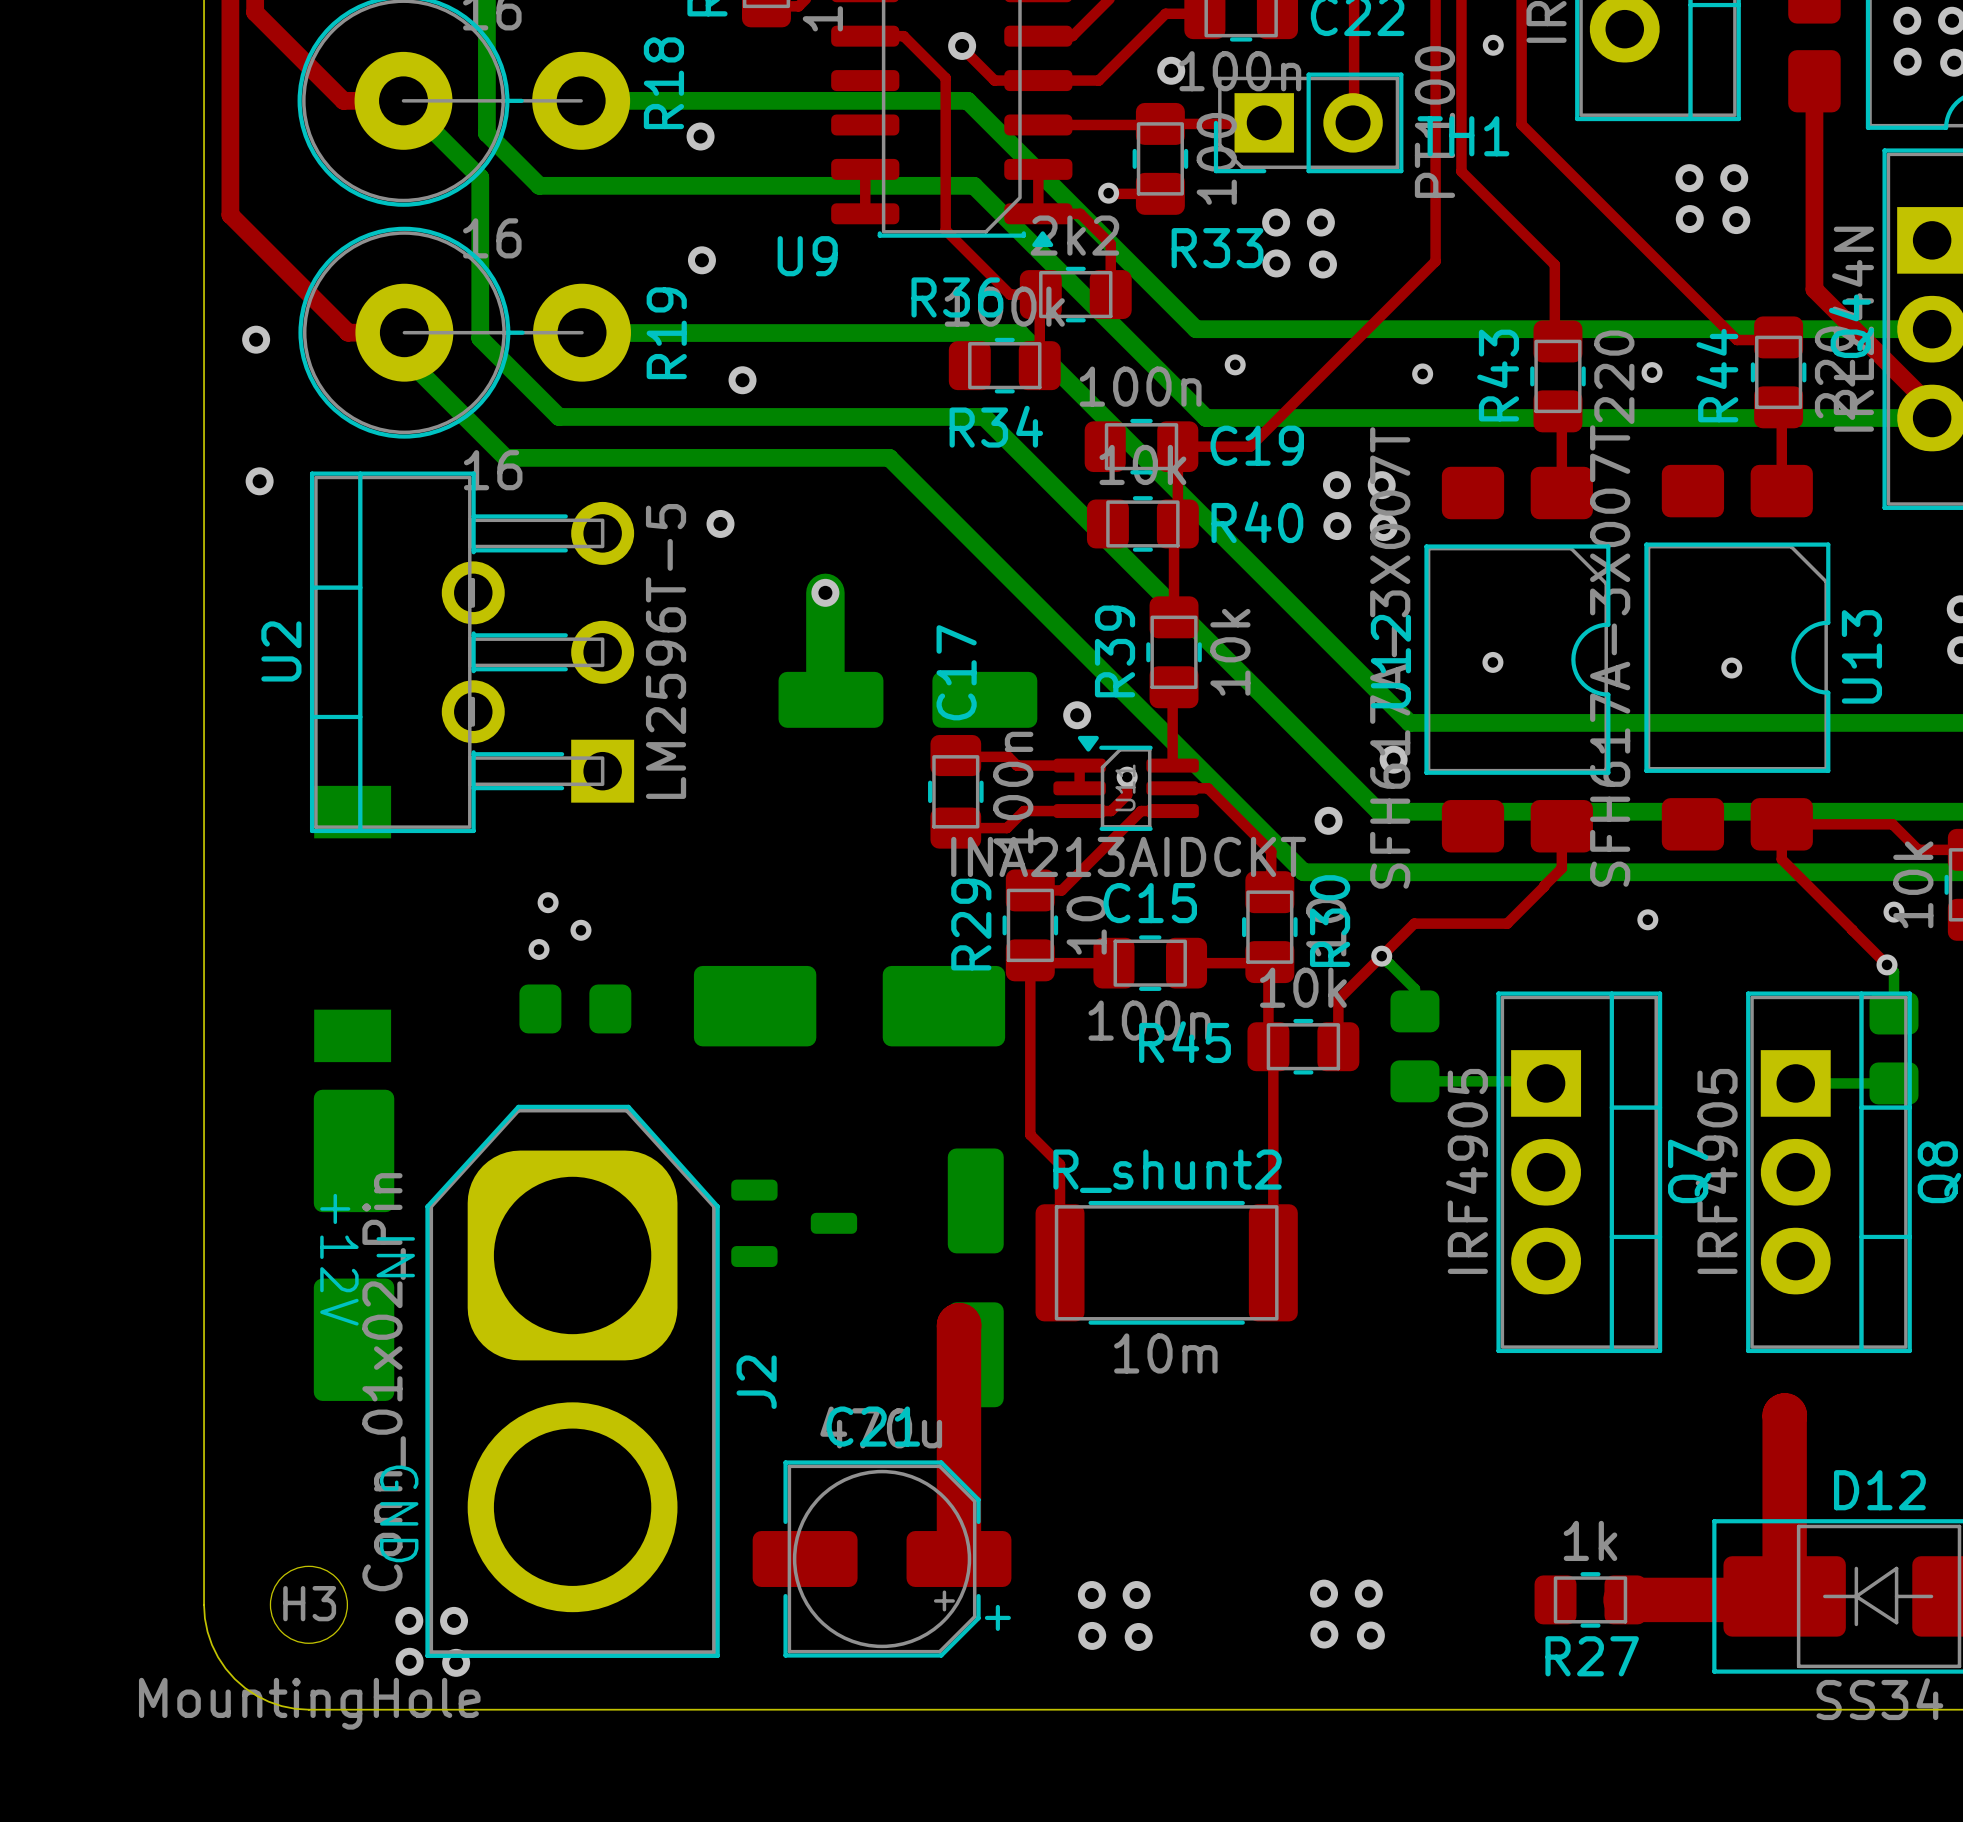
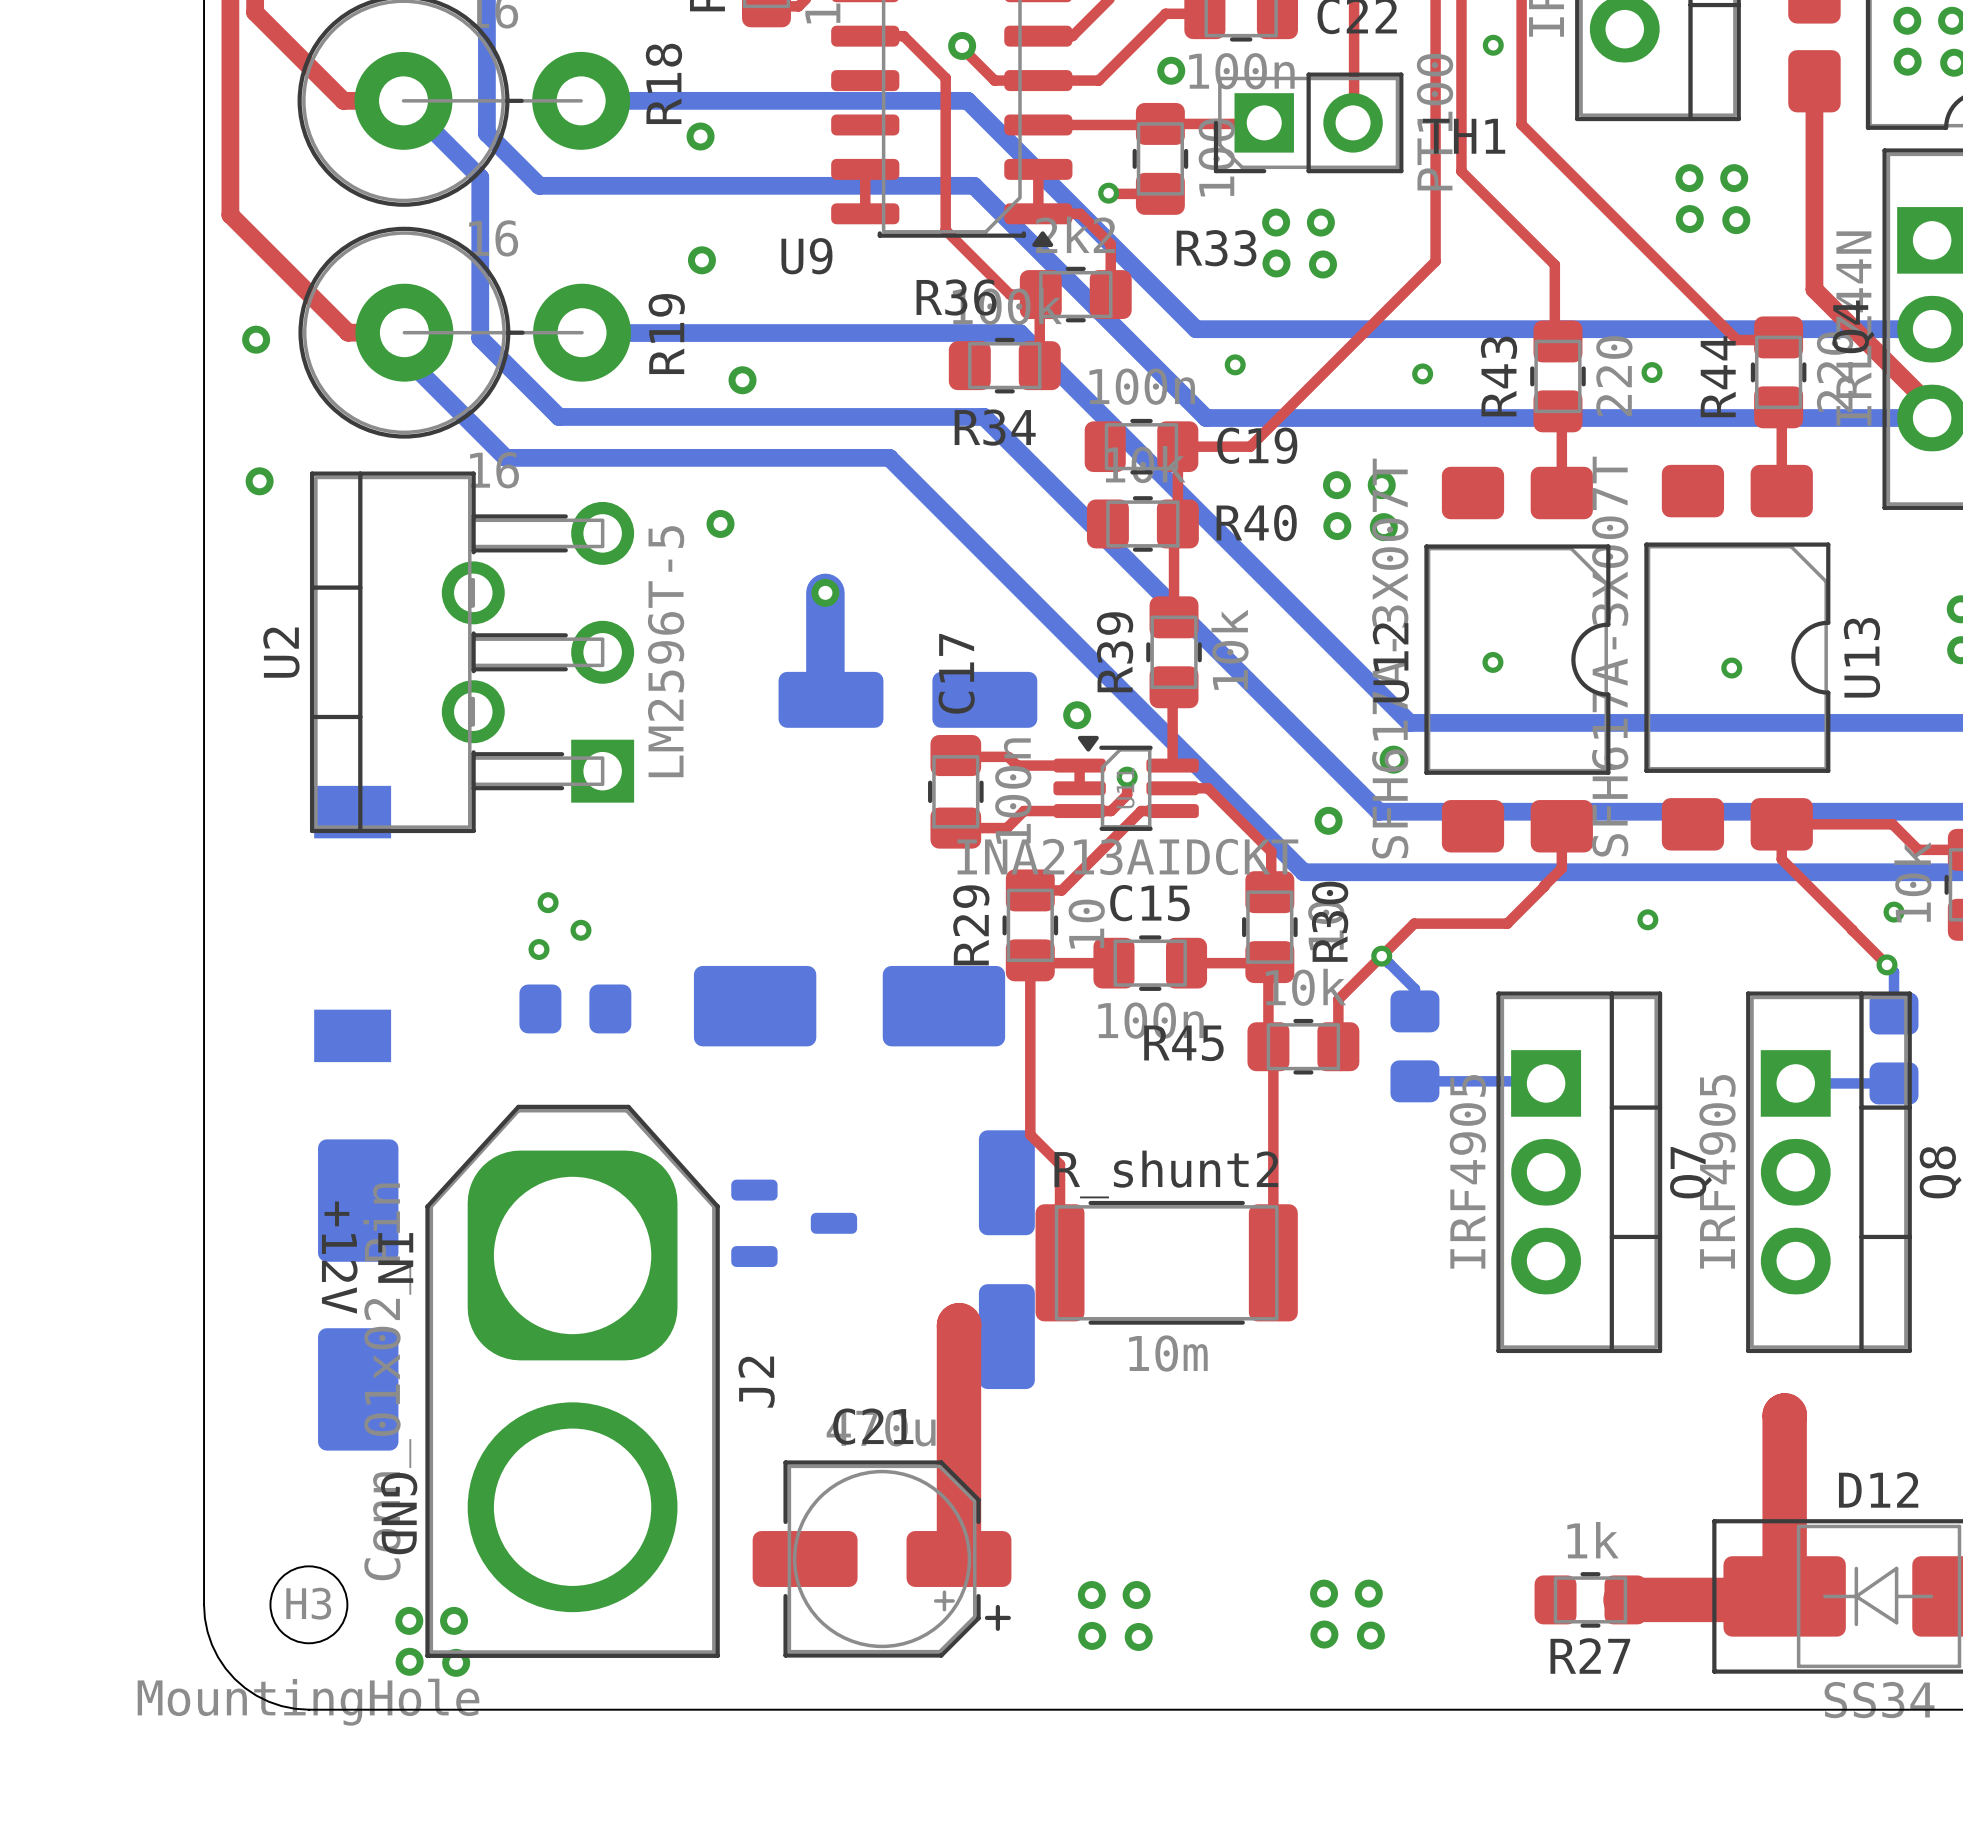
part position: (354, 1245) -> (358, 1294)
part position: (975, 1277) -> (1006, 1259)

